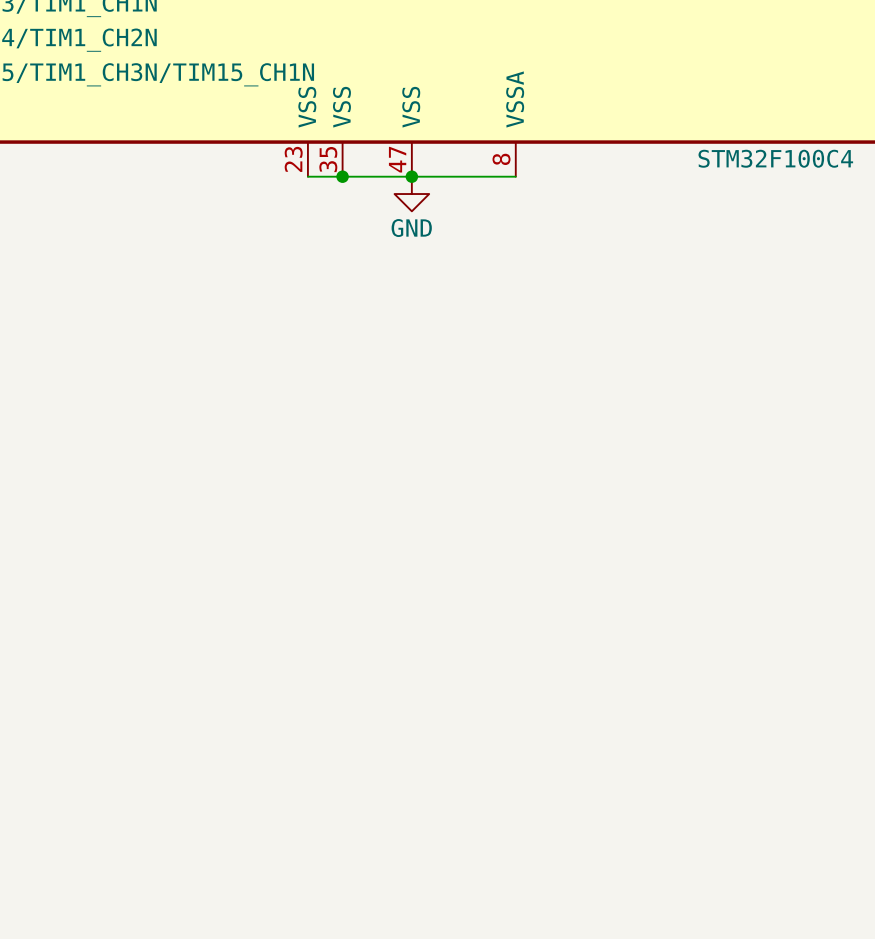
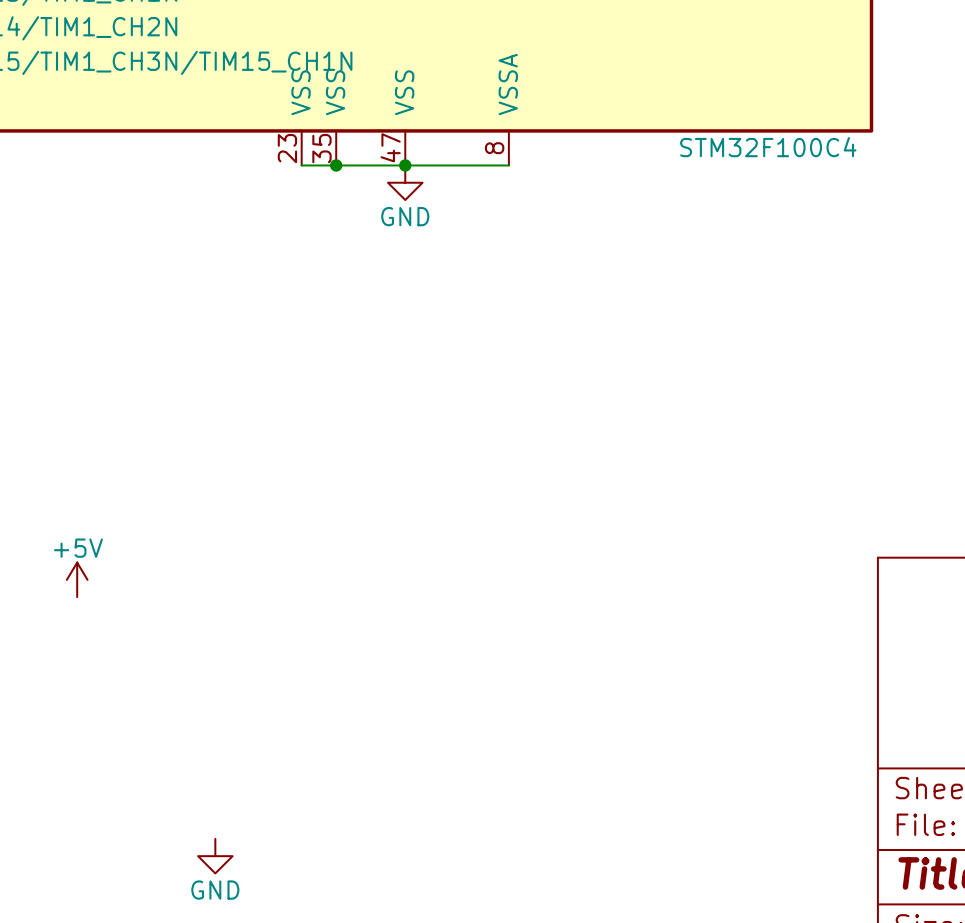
power symbol: none -> +5V (77, 579)
power symbol: none -> GND (215, 856)

